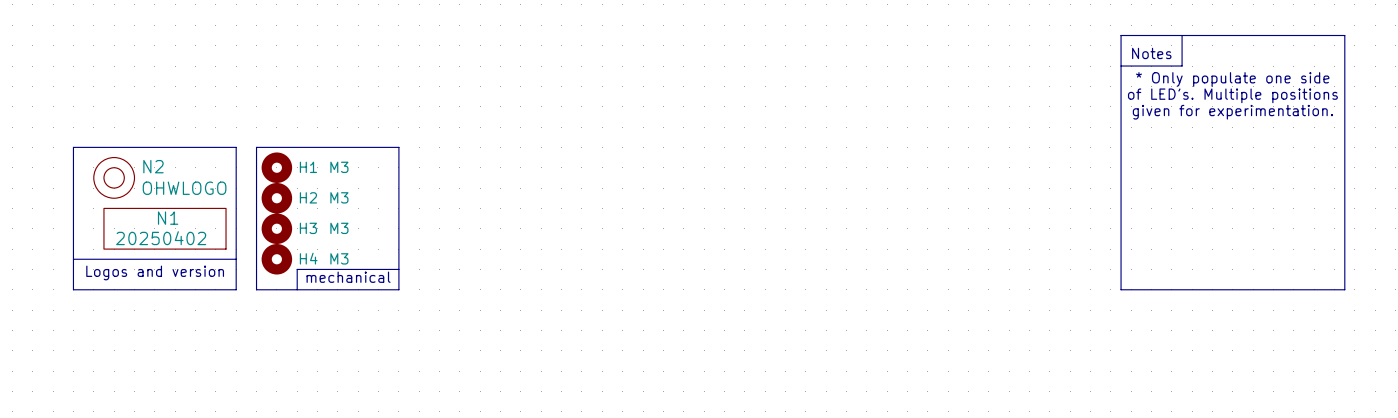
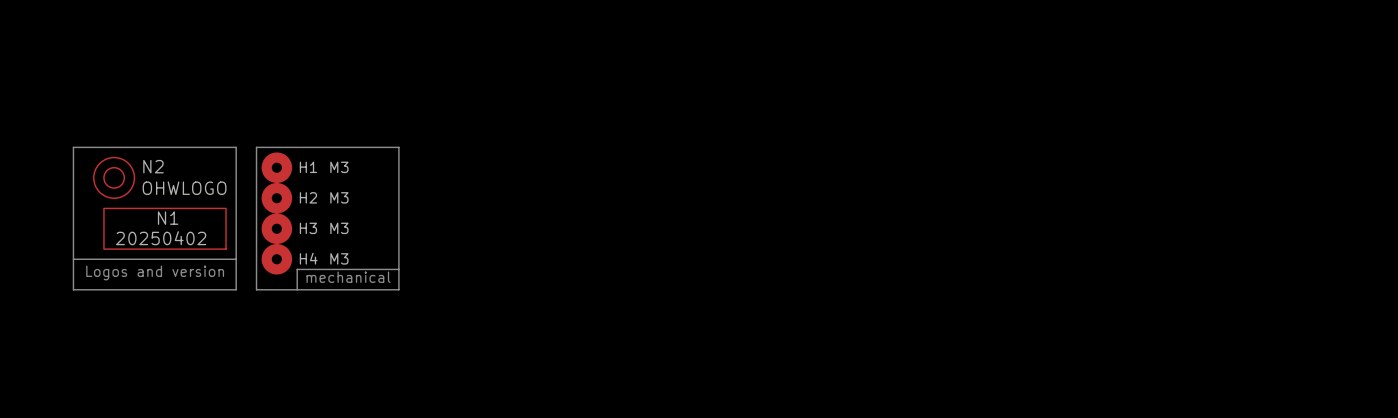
line: (1121, 35) (1344, 35) (1344, 289) (1121, 289) (1121, 35) -> none
line: (1182, 35) (1182, 66) (1121, 66) -> none
text: Notes (1151, 53) -> none
text: * Only populate one side (1232, 79) -> none
text: of LED's. Multiple positions (1232, 95) -> none
text: given for experimentation. (1232, 112) -> none

